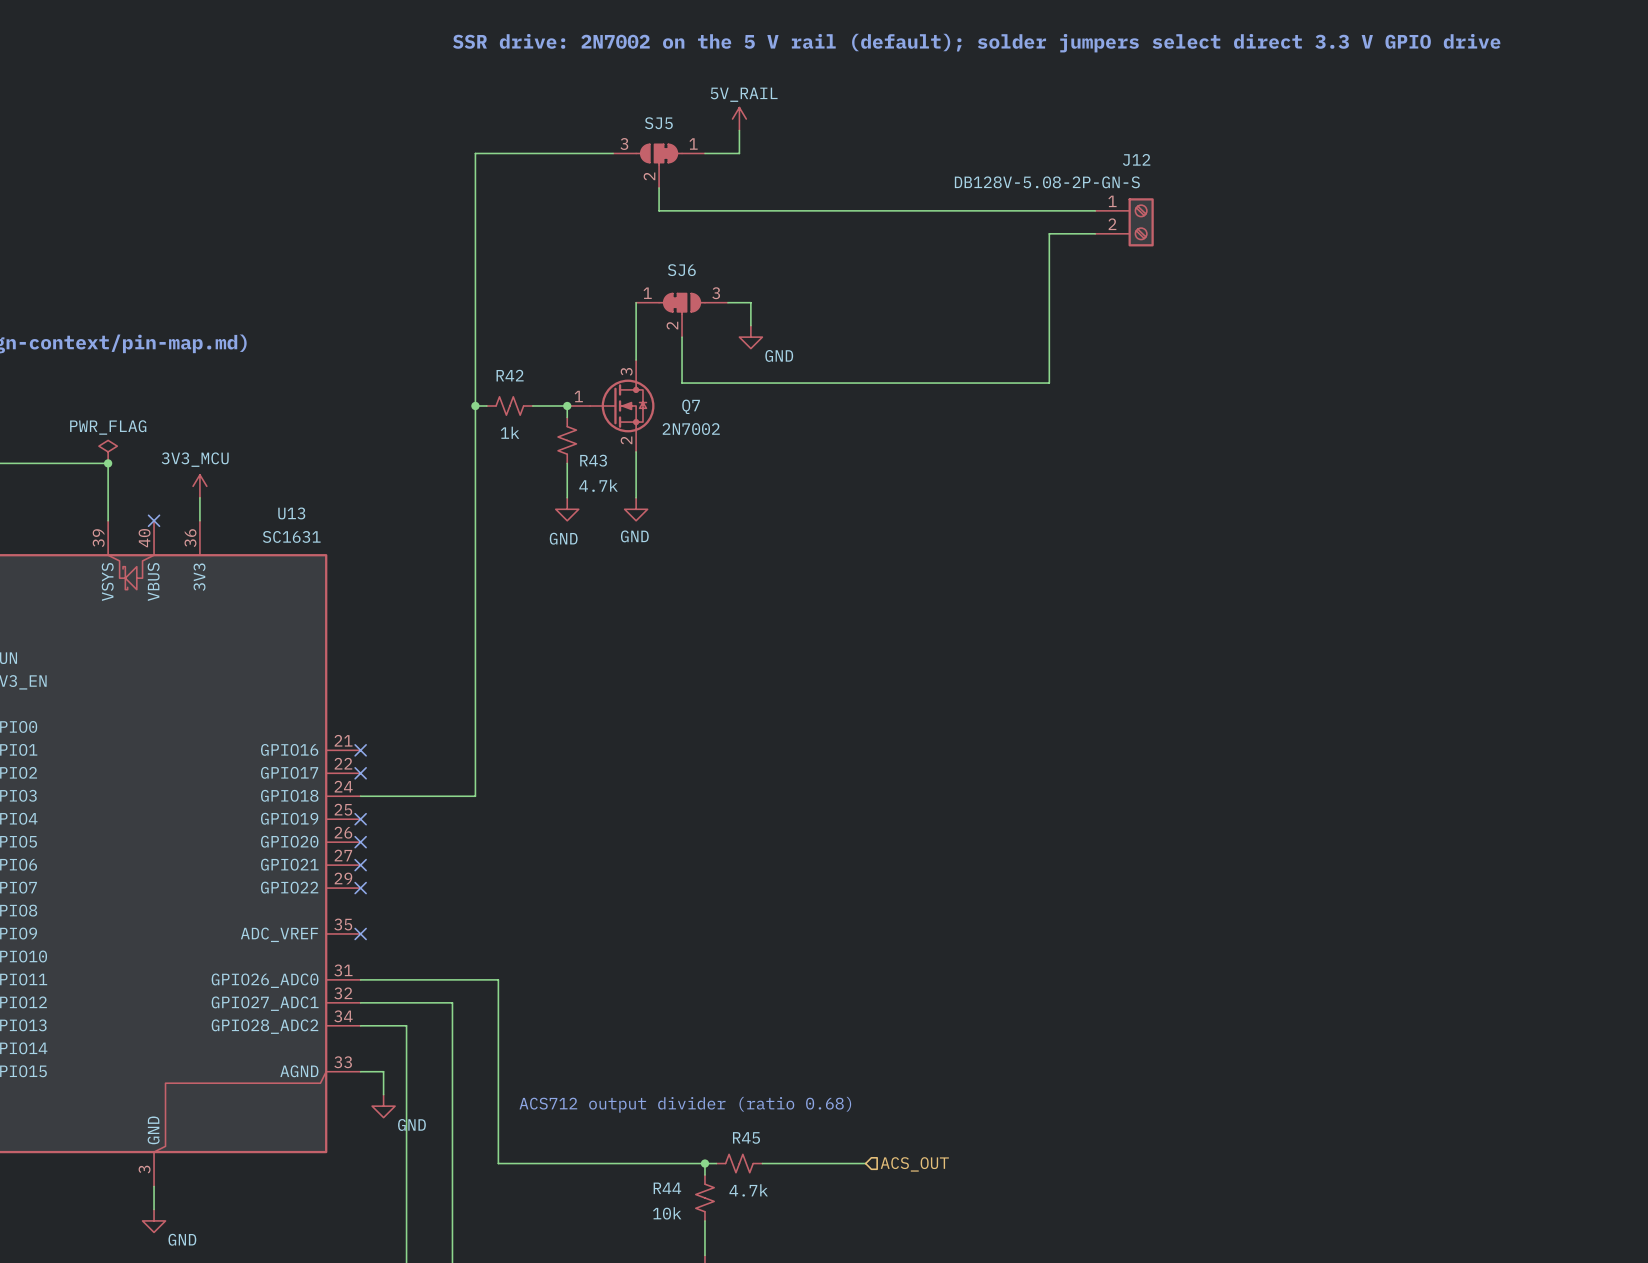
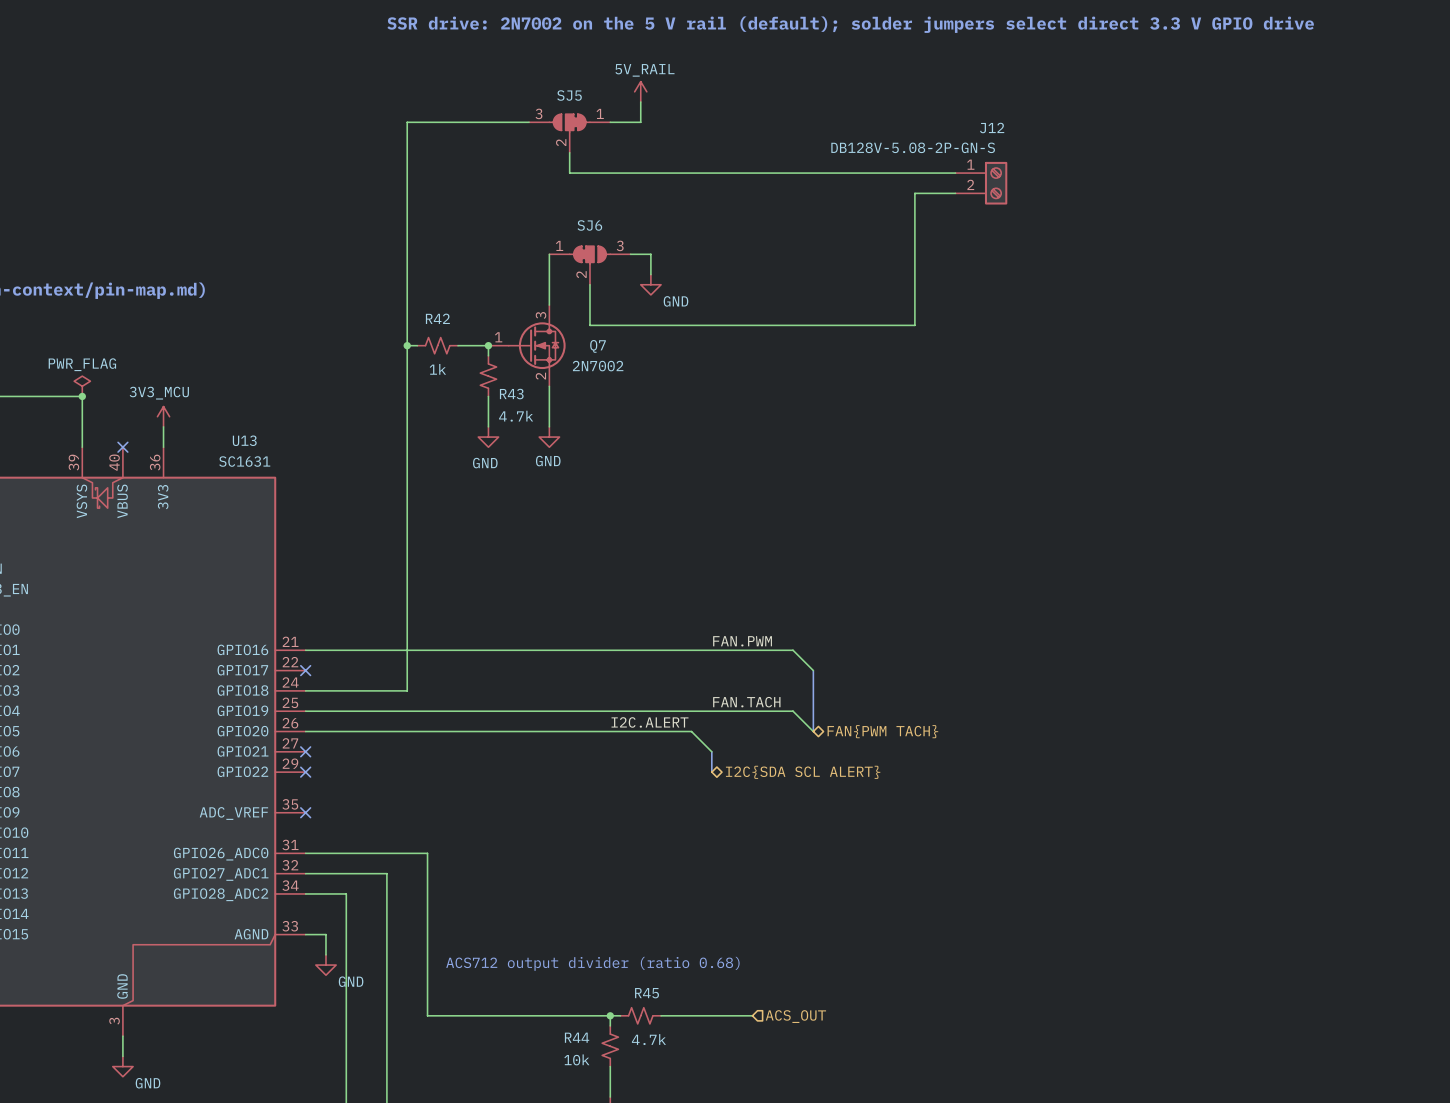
label: none -> FAN.PWM (742, 641)
wire: none -> (305, 650) (793, 650) (813, 670)
no-connect mark: (360, 750) -> none
bus: none -> (813, 670) (813, 731)
label: none -> FAN.TACH (746, 702)
wire: none -> (305, 711) (793, 711) (813, 731)
no-connect mark: (360, 819) -> none
label: none -> I2C.ALERT (650, 722)
wire: none -> (305, 731) (691, 731) (711, 751)
no-connect mark: (360, 842) -> none
hierarchical label: none -> FAN{PWM TACH} (882, 731)
bus: none -> (711, 751) (711, 772)
hierarchical label: none -> I2C{SDA SCL ALERT} (803, 772)

